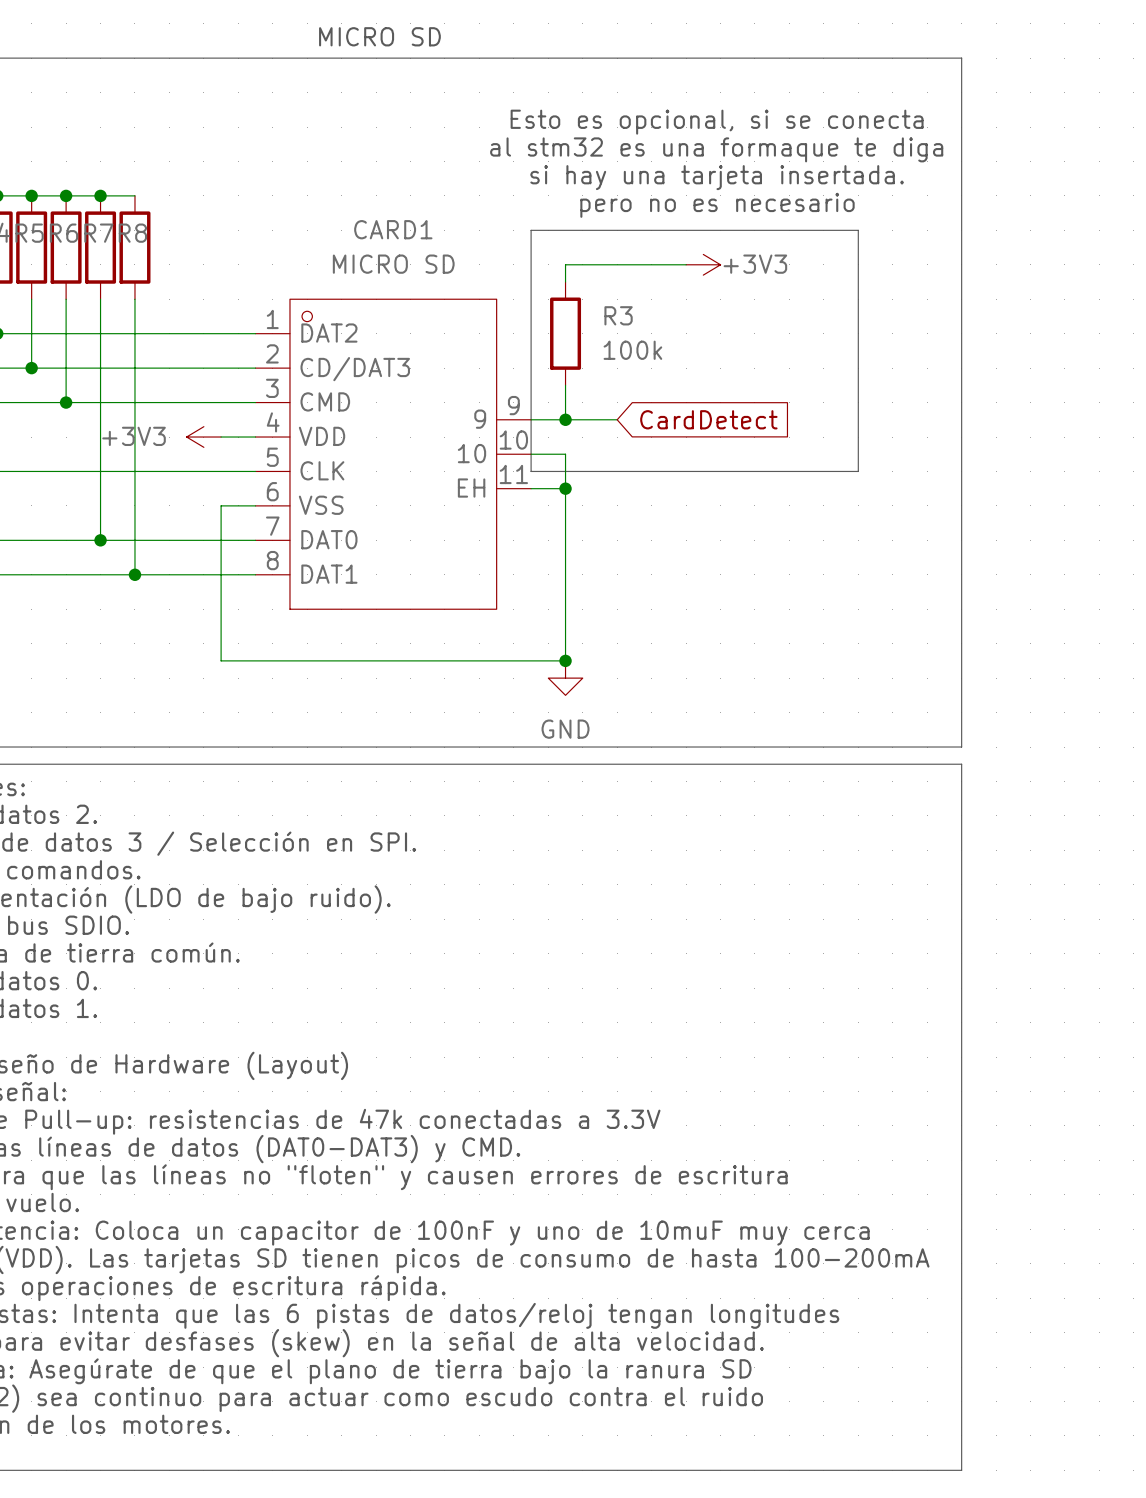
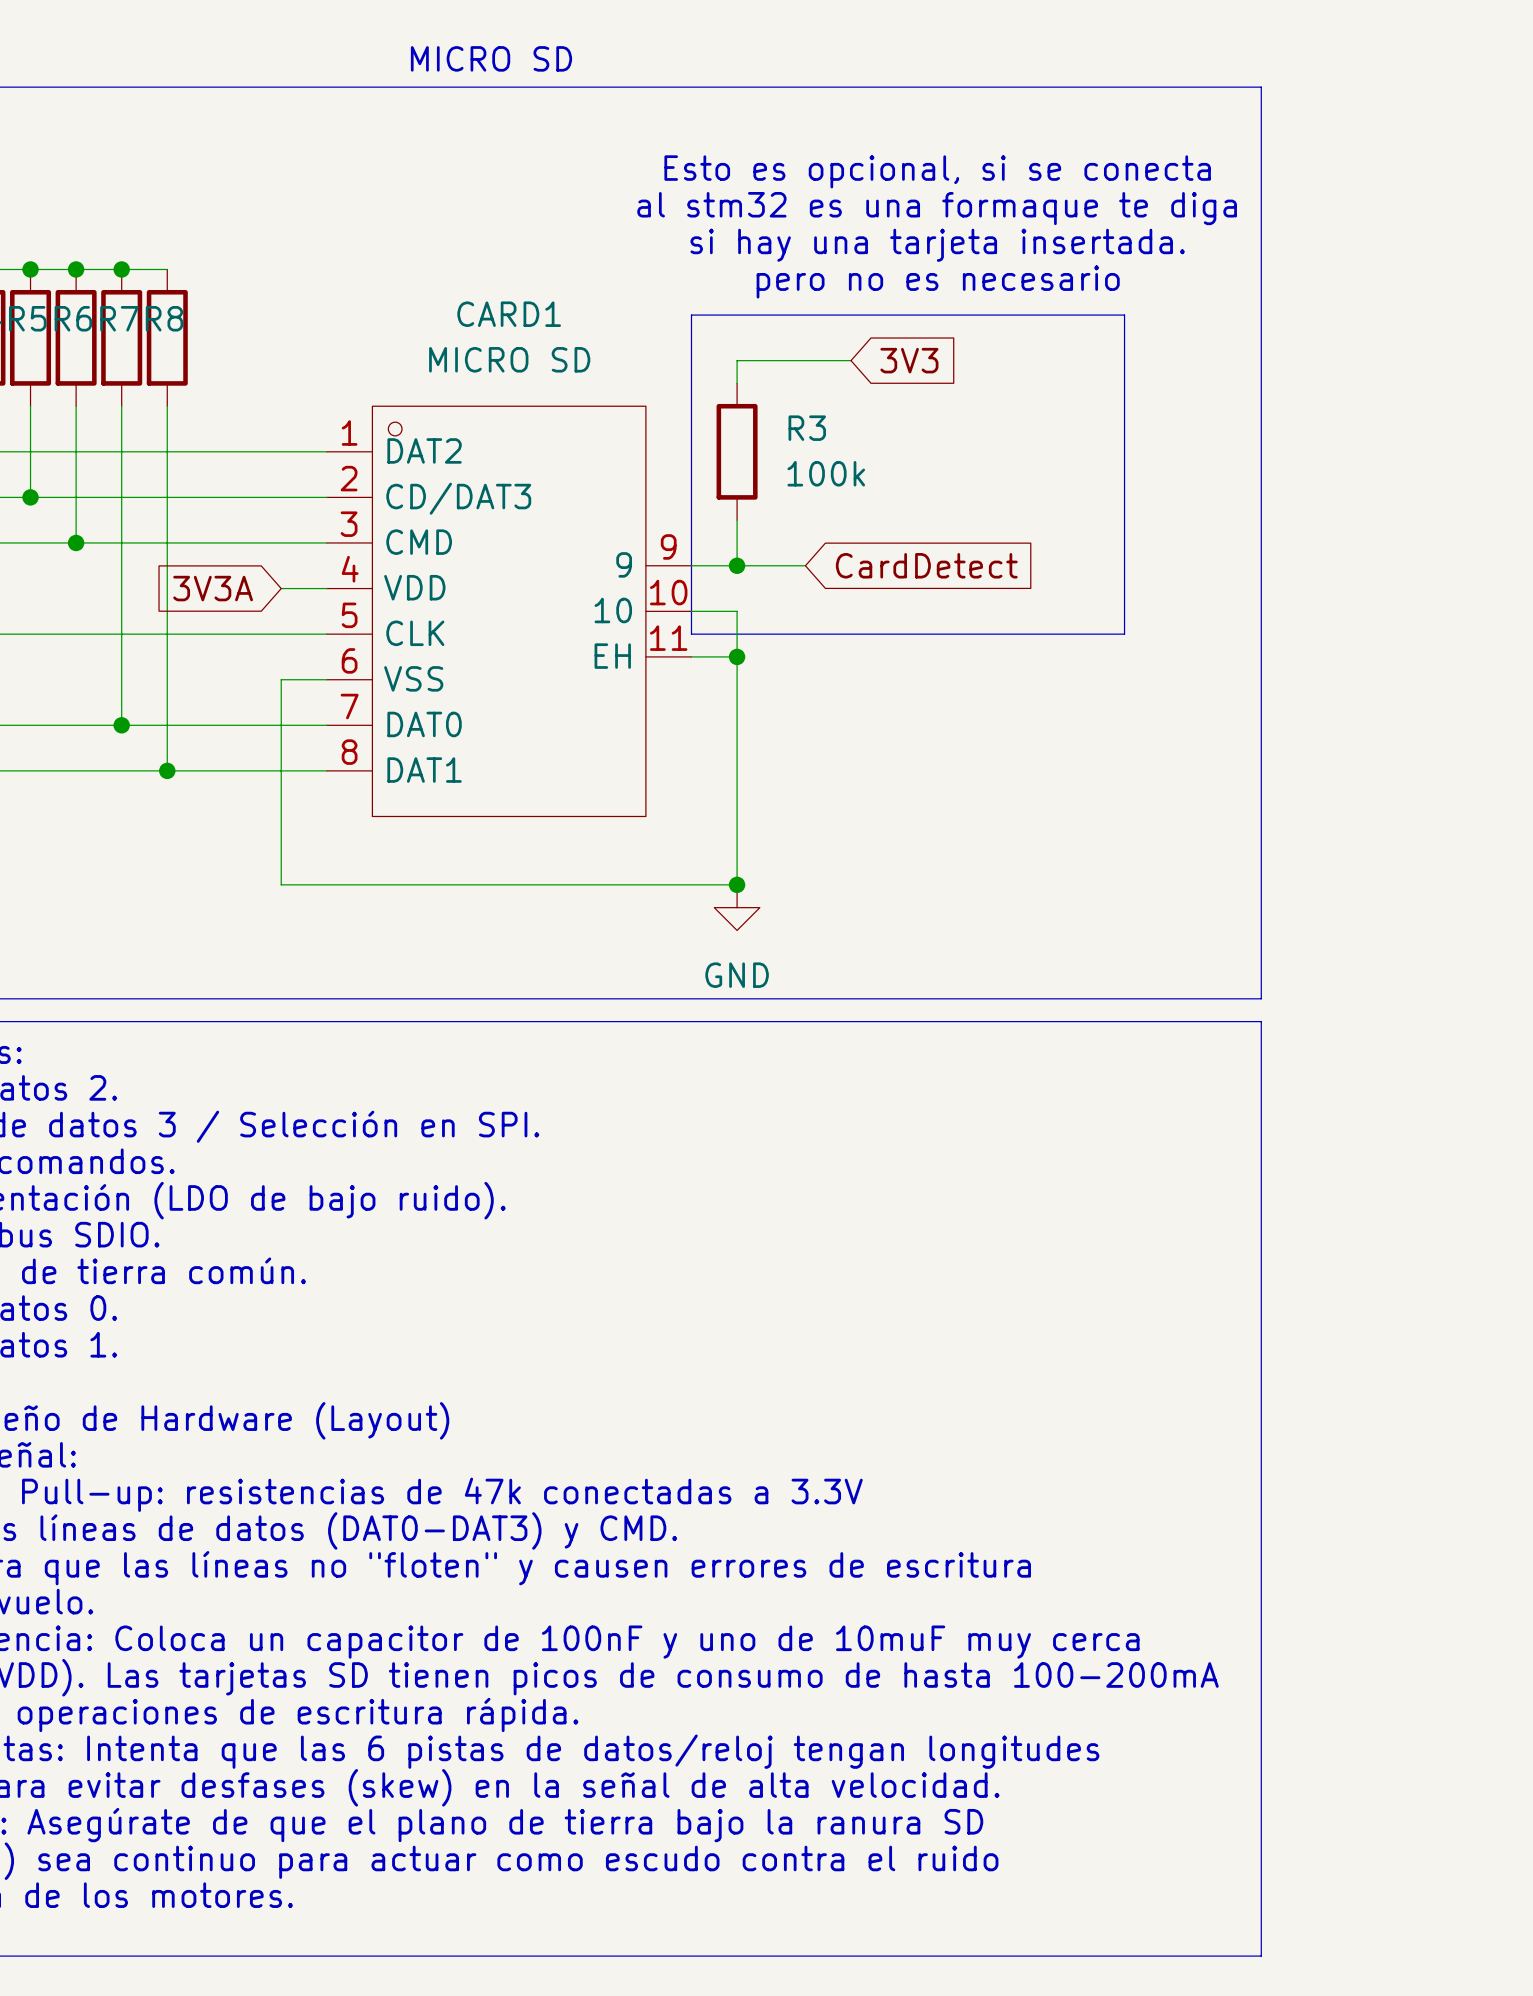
wire: (651, 264) (686, 264) -> none
global label: none -> 3V3 (909, 360)
power symbol: +3V3 (703, 264) -> none
global label: none -> 3V3A (213, 588)
power symbol: +3V3 (203, 437) -> none

